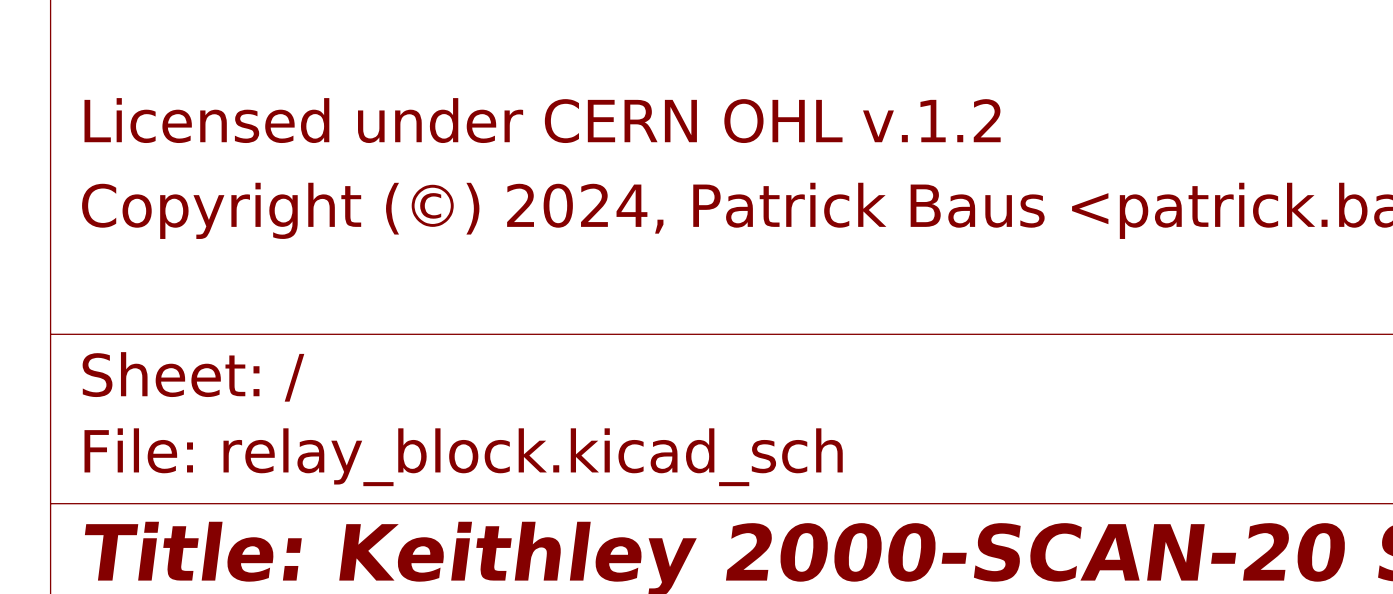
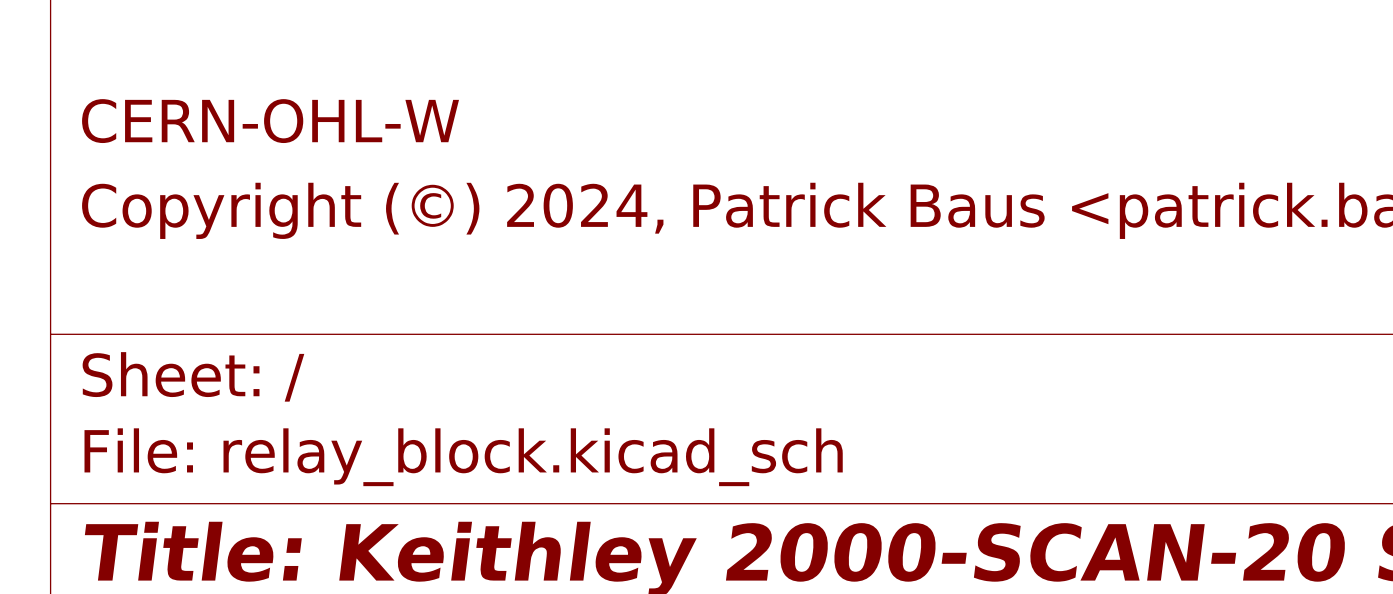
title block: Licensed under CERN OHL v.1.2 (542, 120) -> CERN-OHL-W (270, 121)

